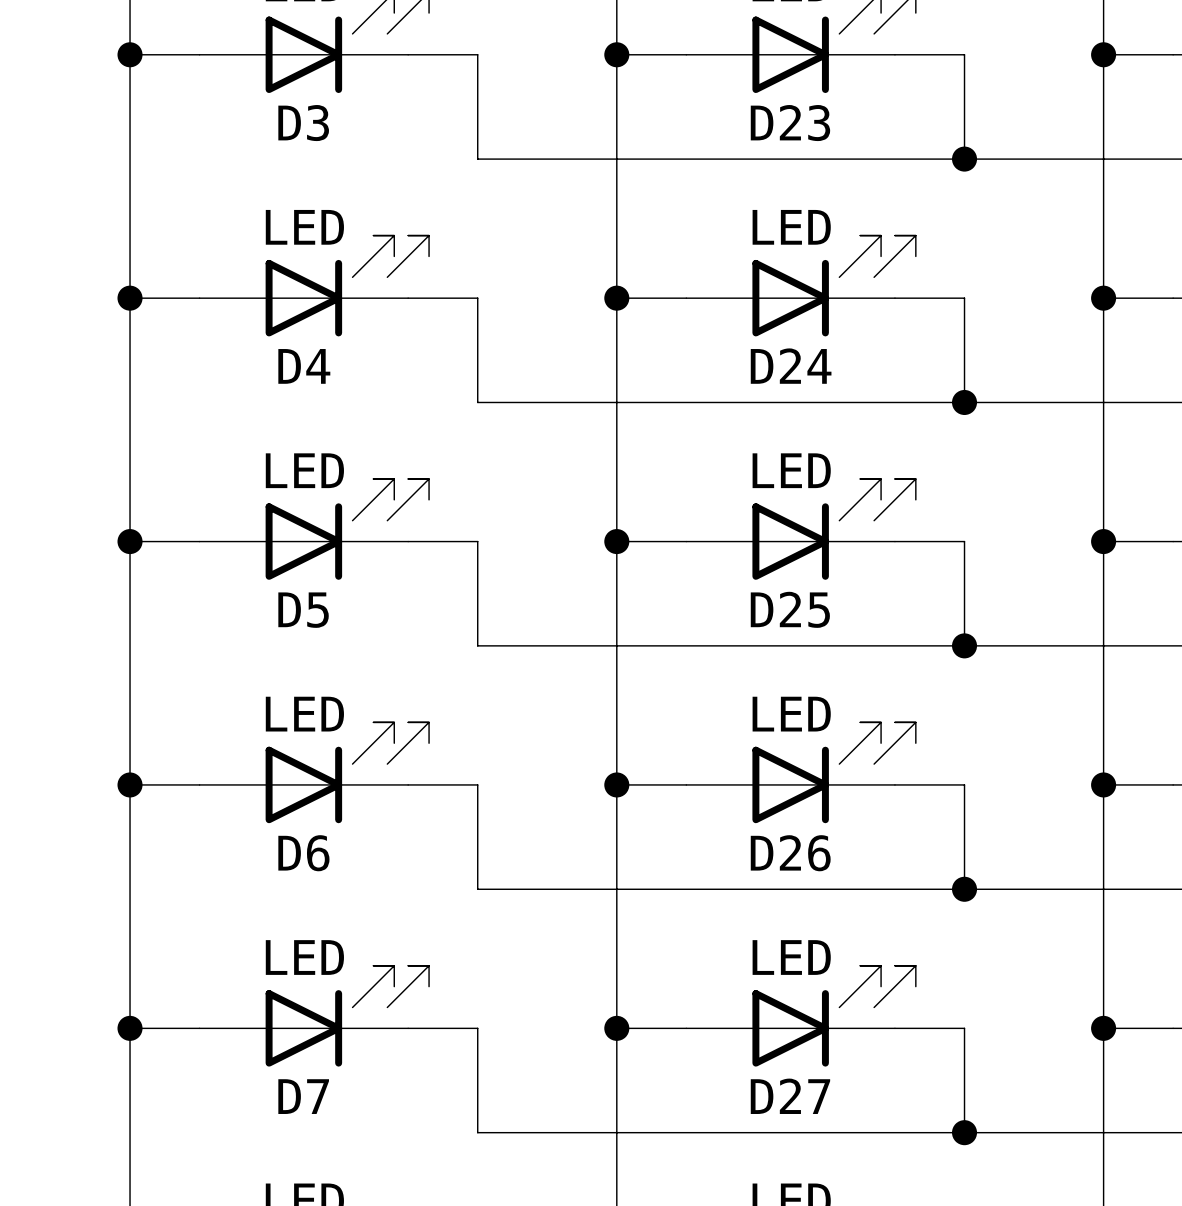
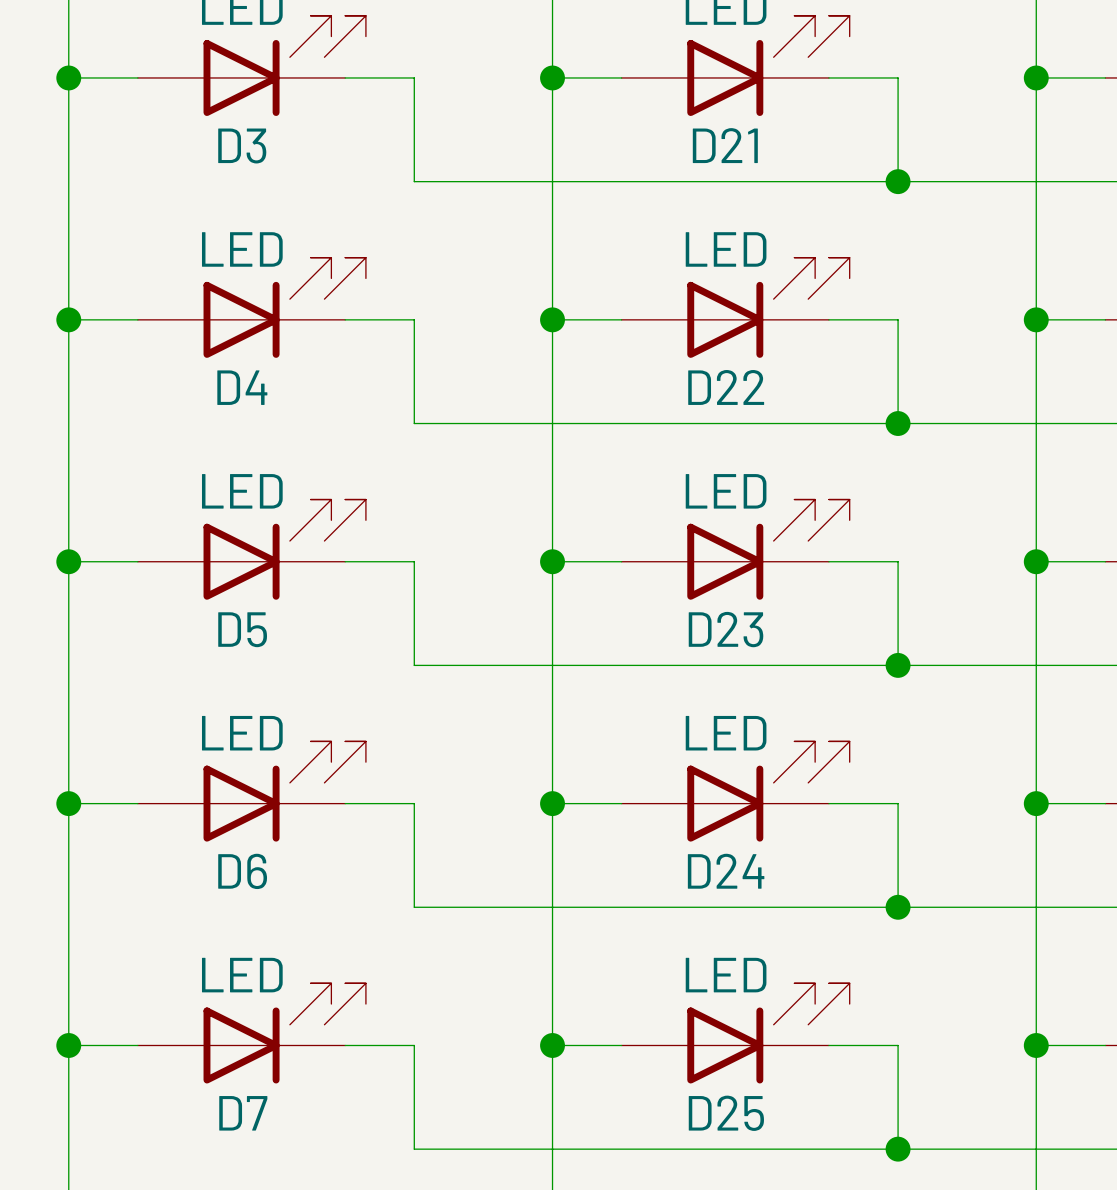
D23 name: D23 (790, 123) -> D21 (725, 145)
D24 name: D24 (791, 366) -> D22 (726, 387)
D25 name: D25 (790, 609) -> D23 (726, 629)
D26 name: D26 (790, 853) -> D24 (726, 871)
D27 name: D27 (790, 1096) -> D25 (726, 1113)

